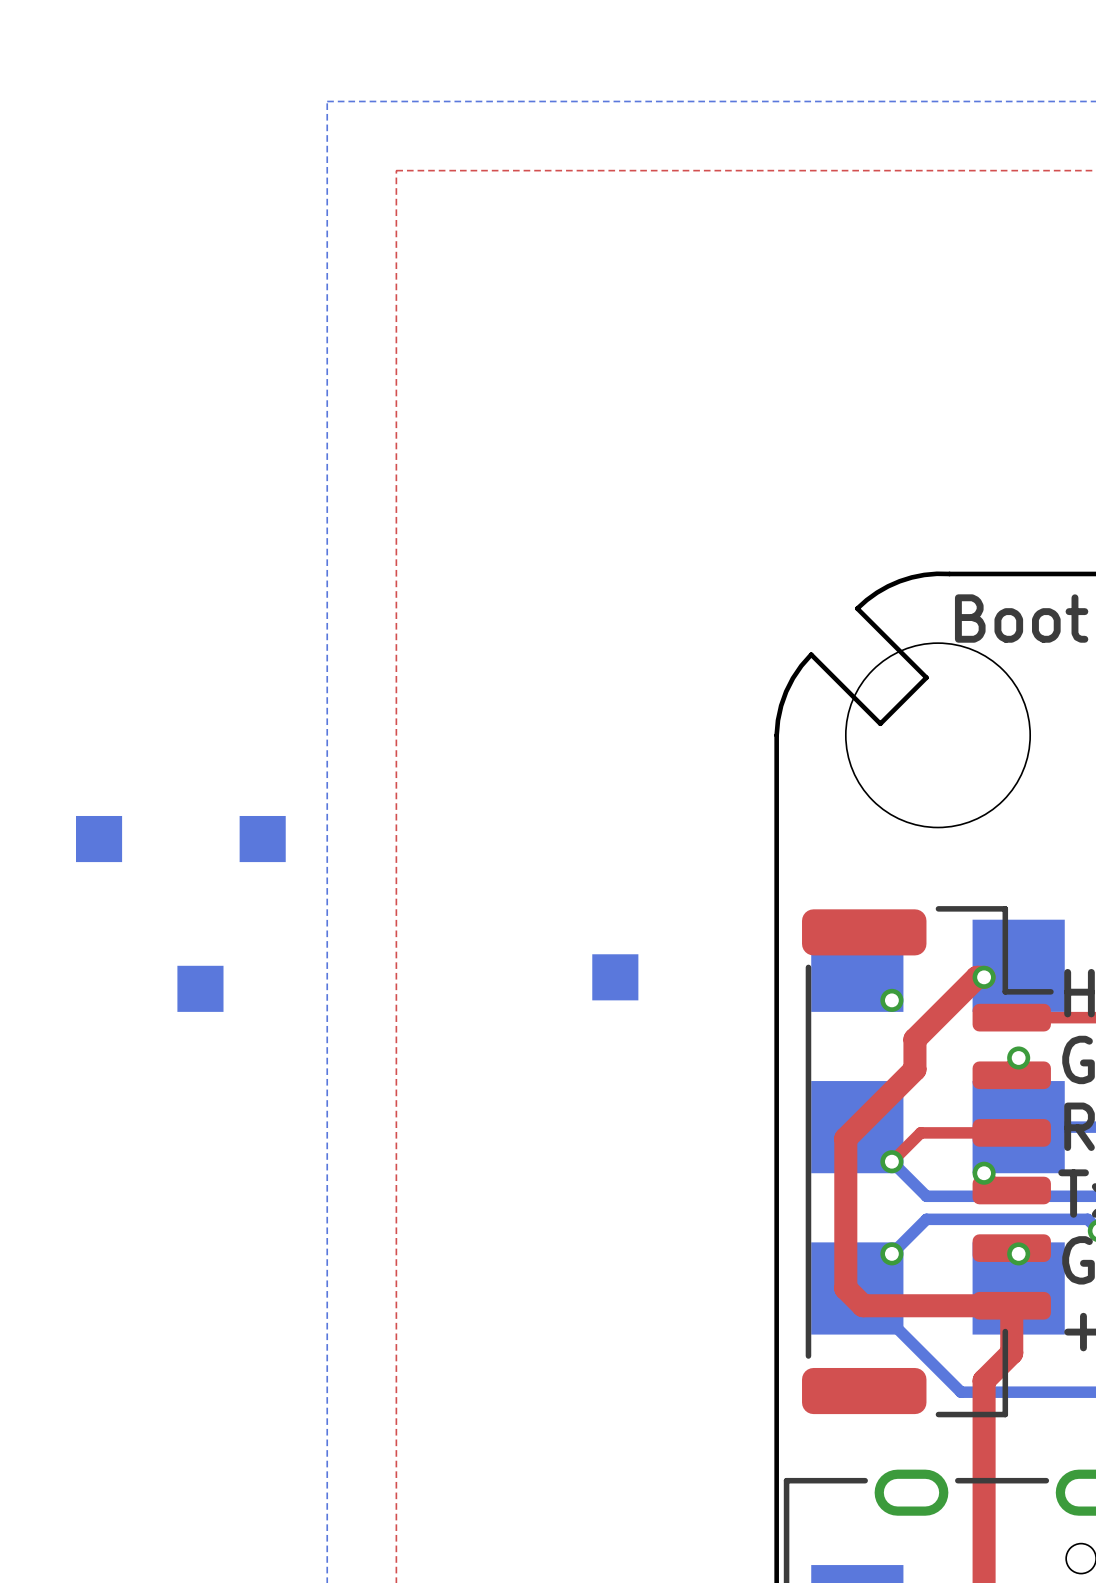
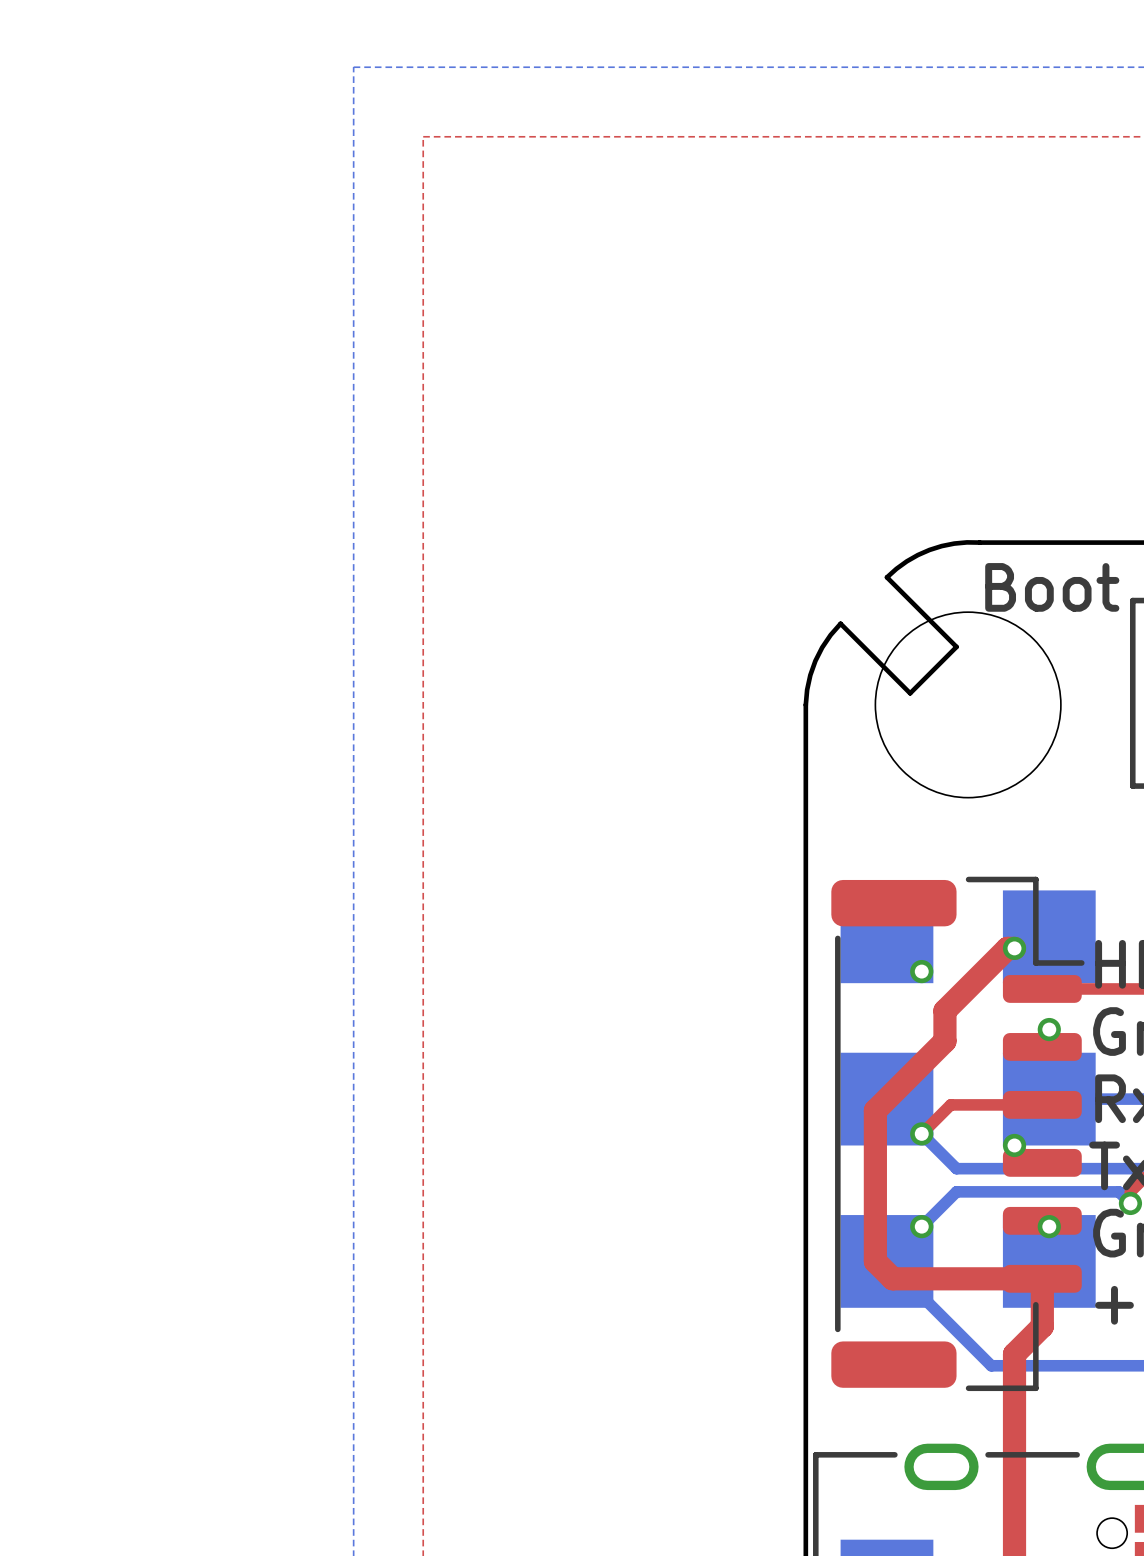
part: (99, 839) -> none
part: (262, 839) -> none
part: (615, 977) -> none
part: (200, 988) -> none

